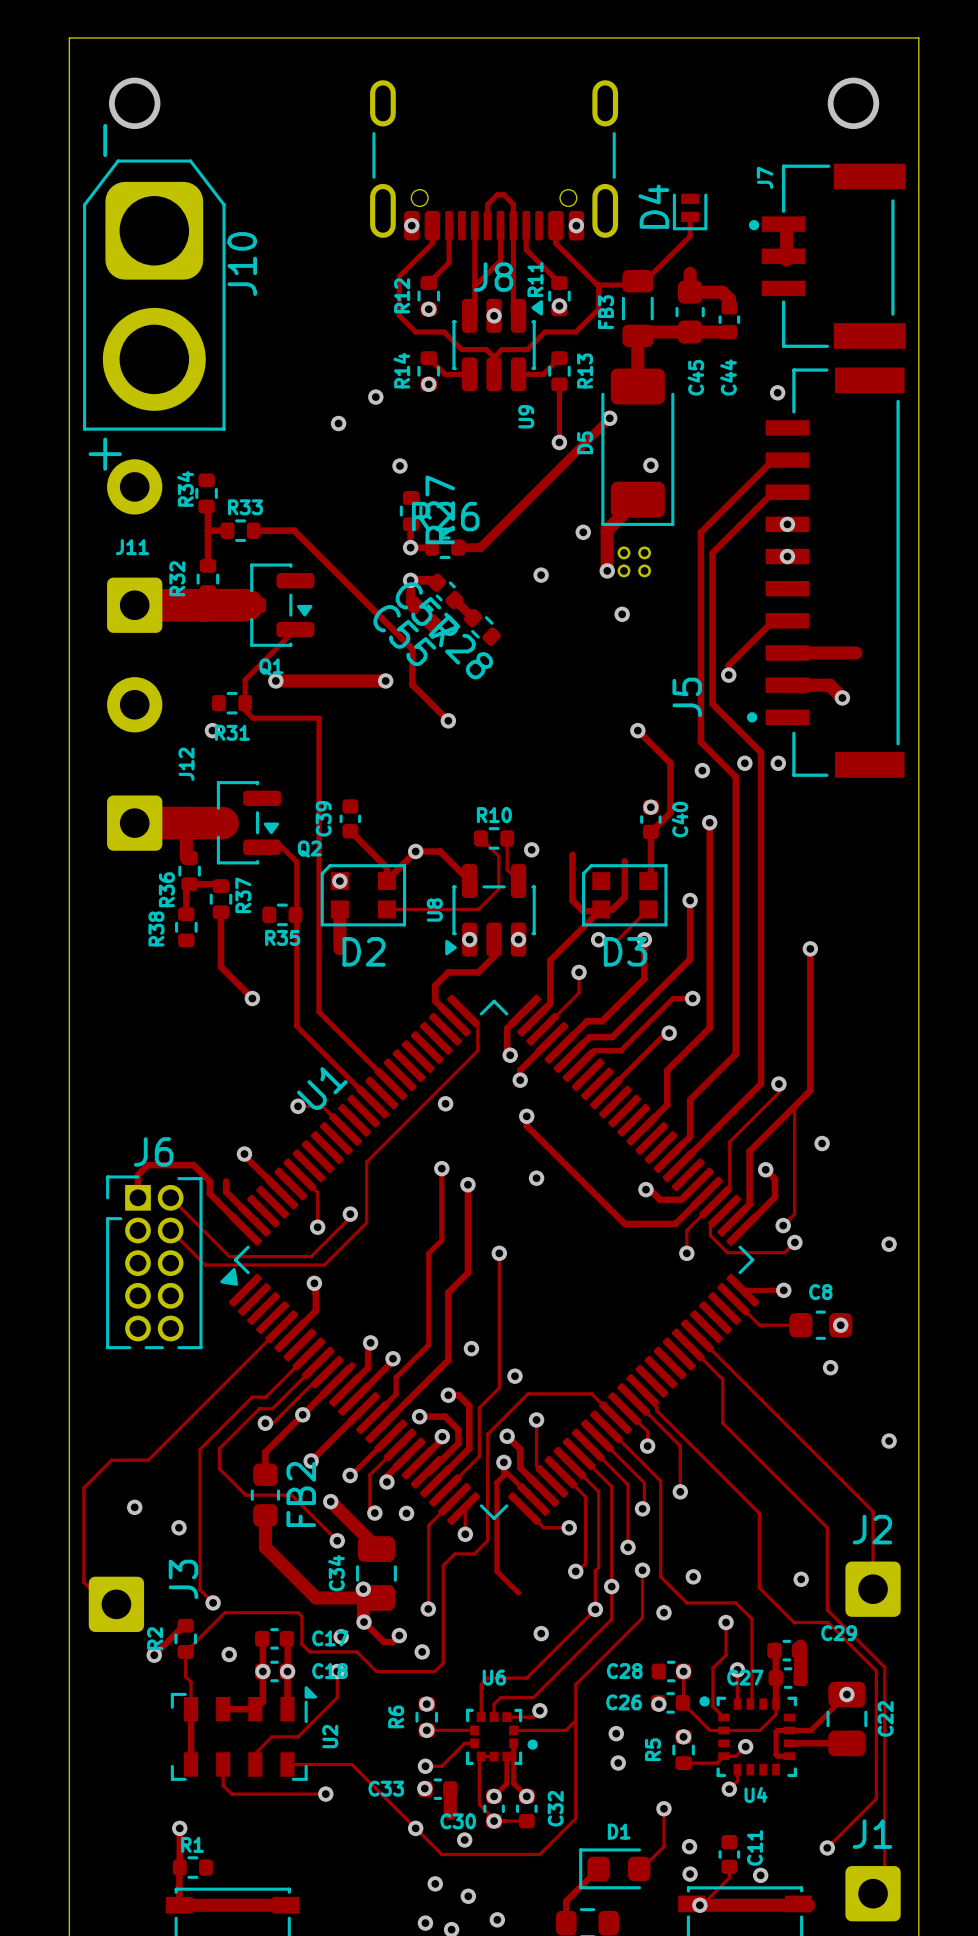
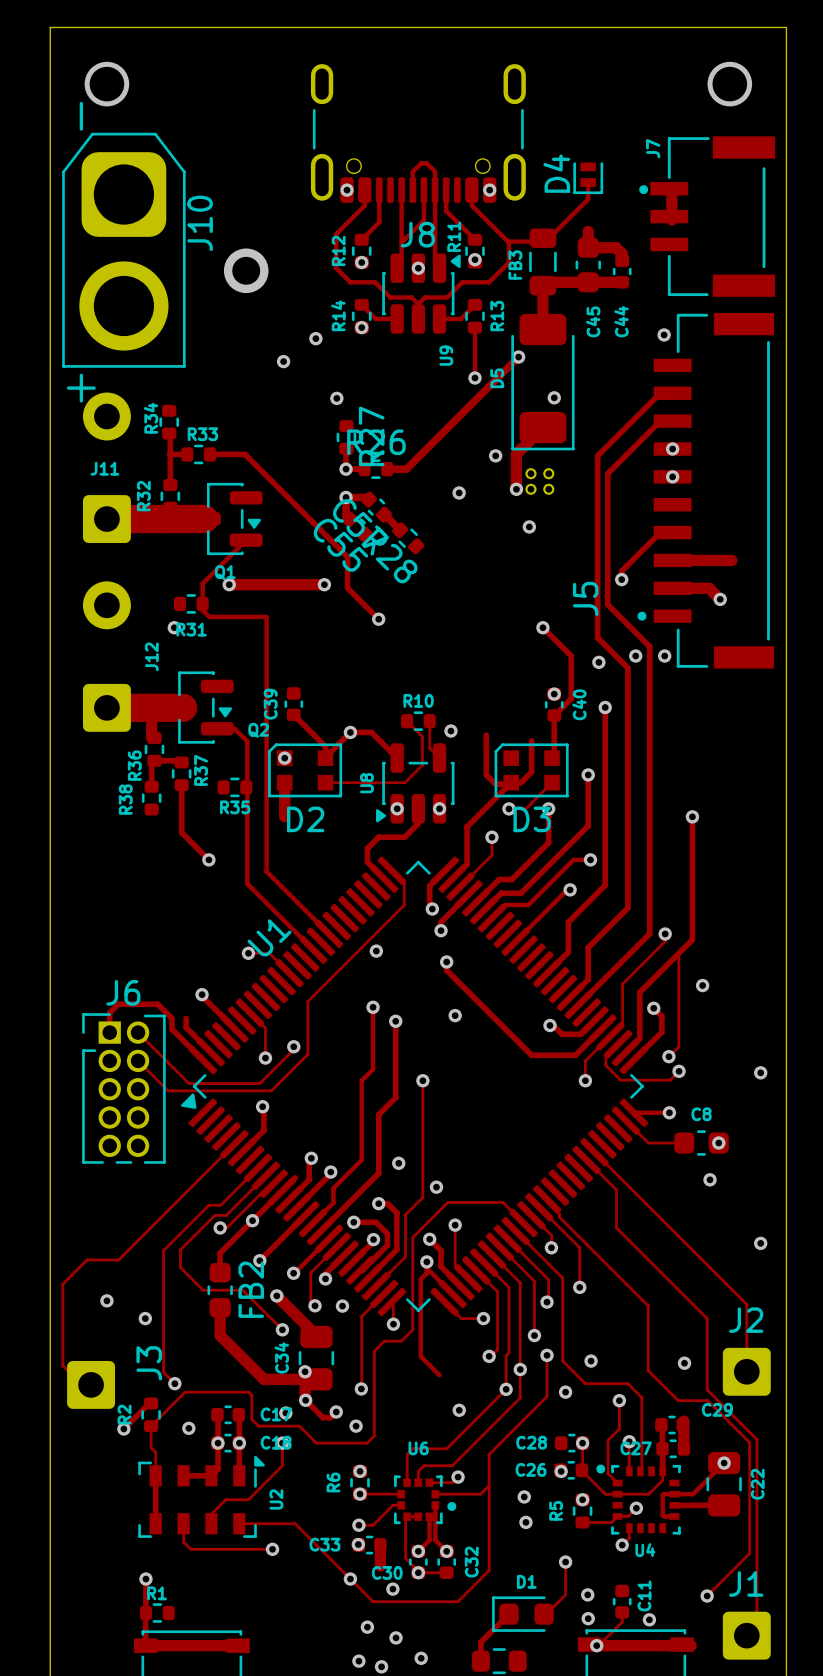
via: none -> (246, 270)

